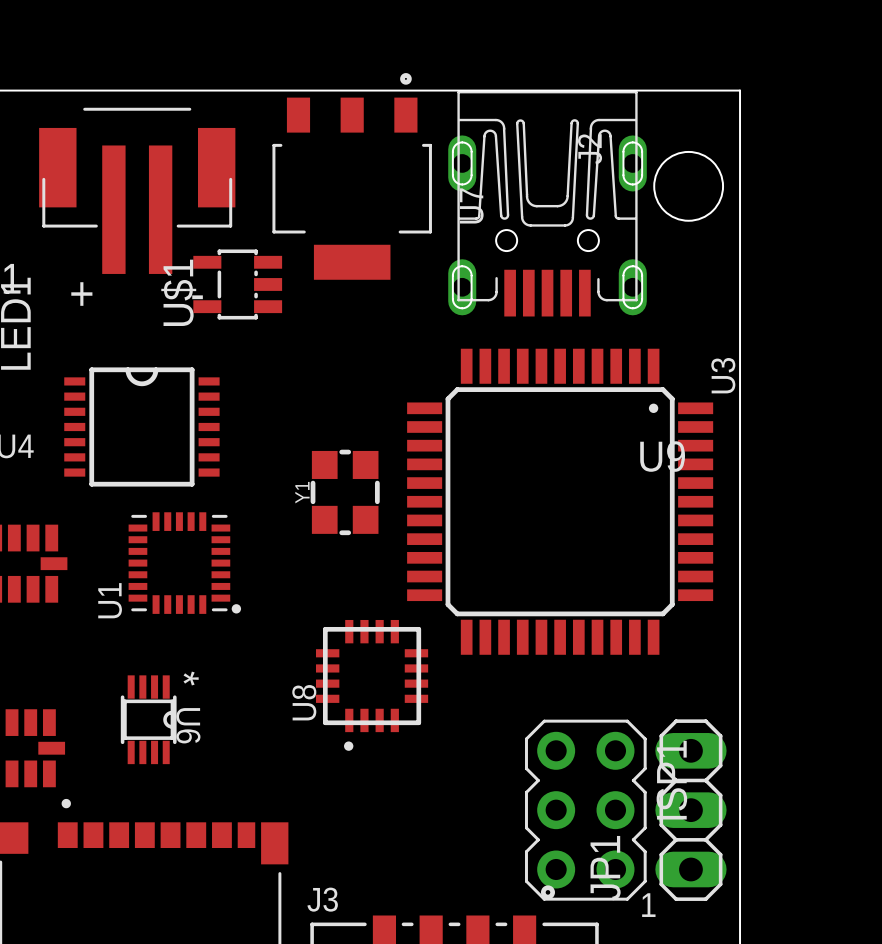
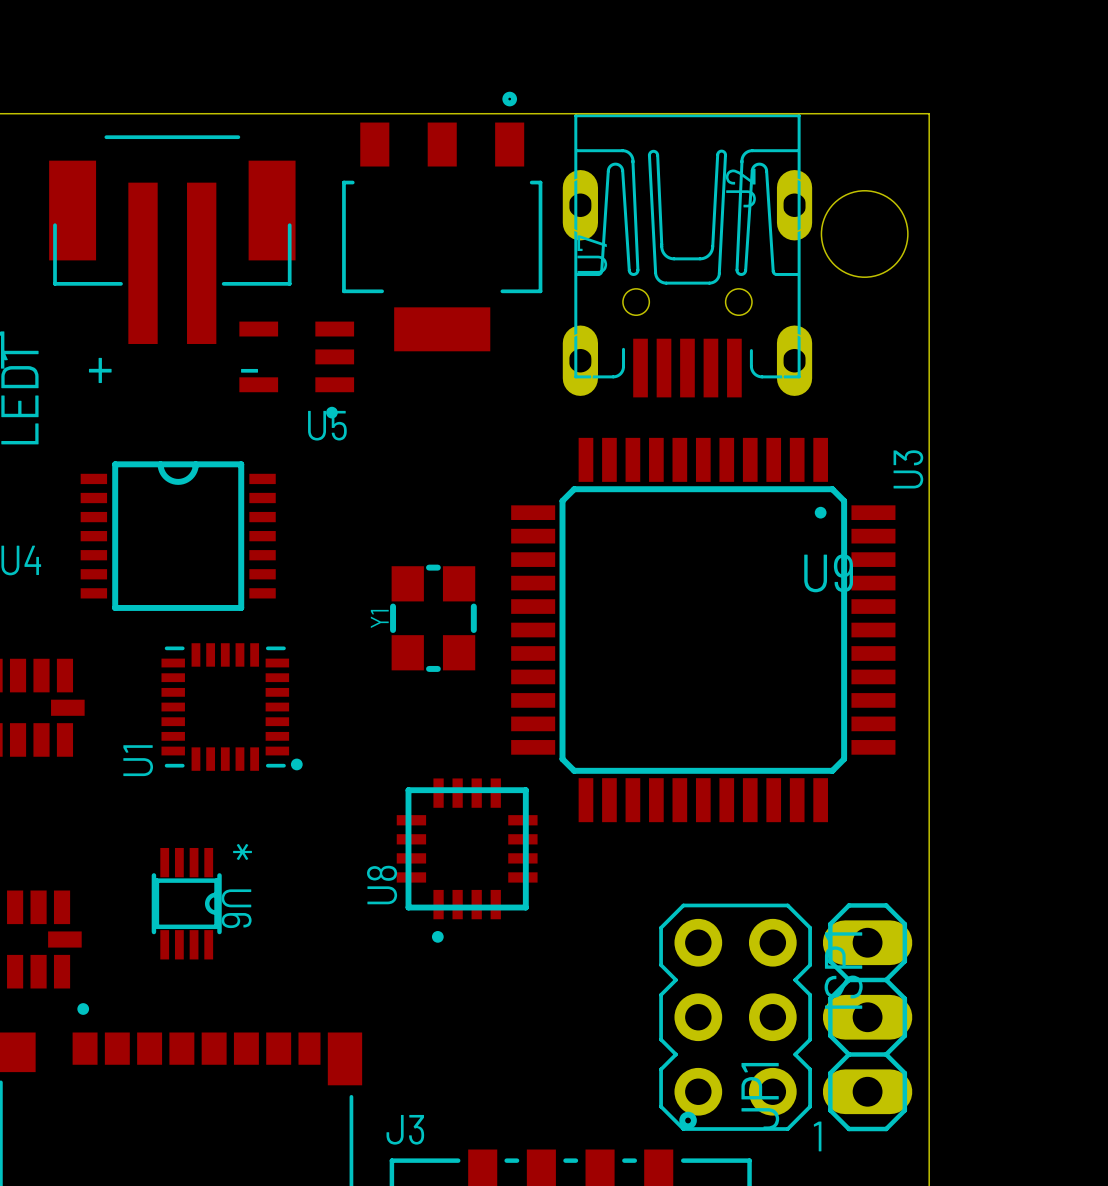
U$1: (237, 284) -> none
U5: none -> (296, 370)

